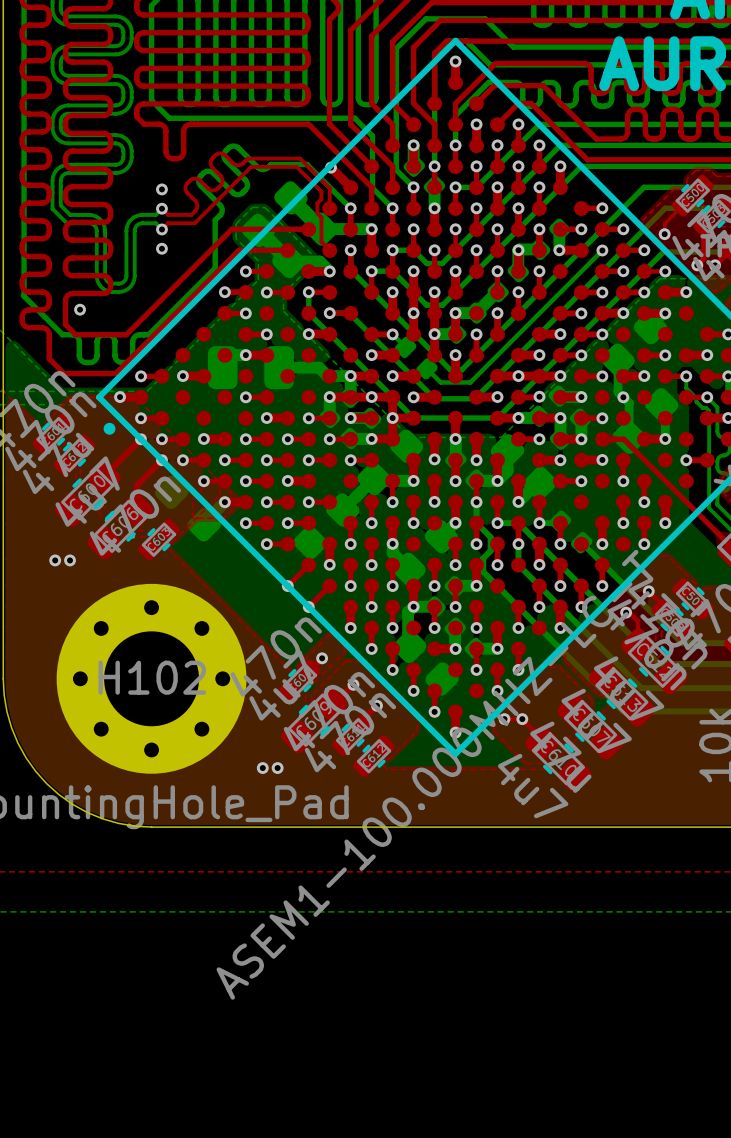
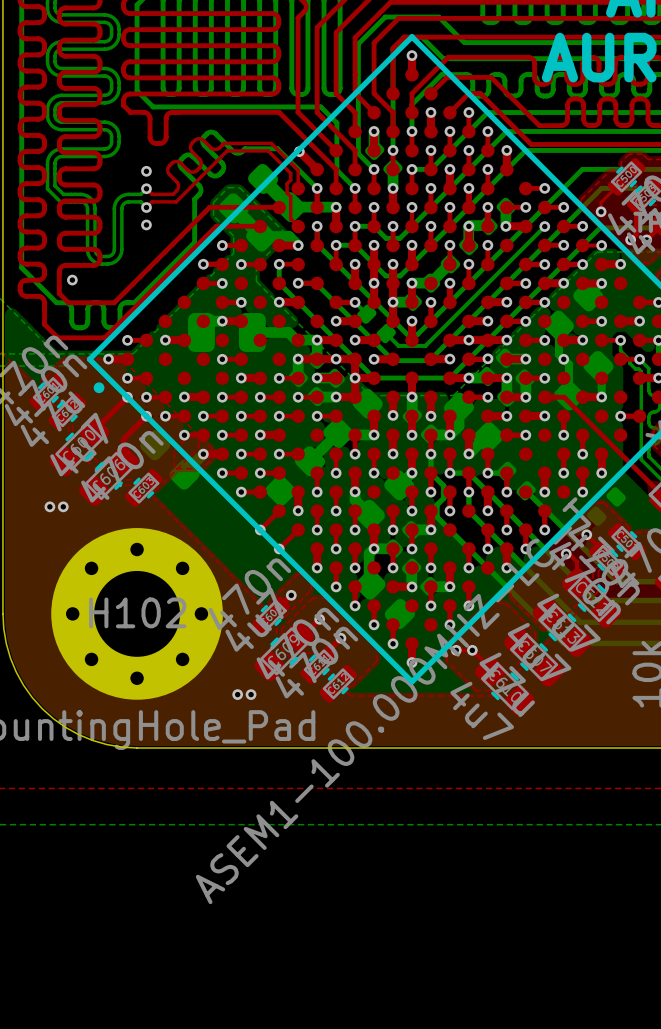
part: none -> (606, 506)

